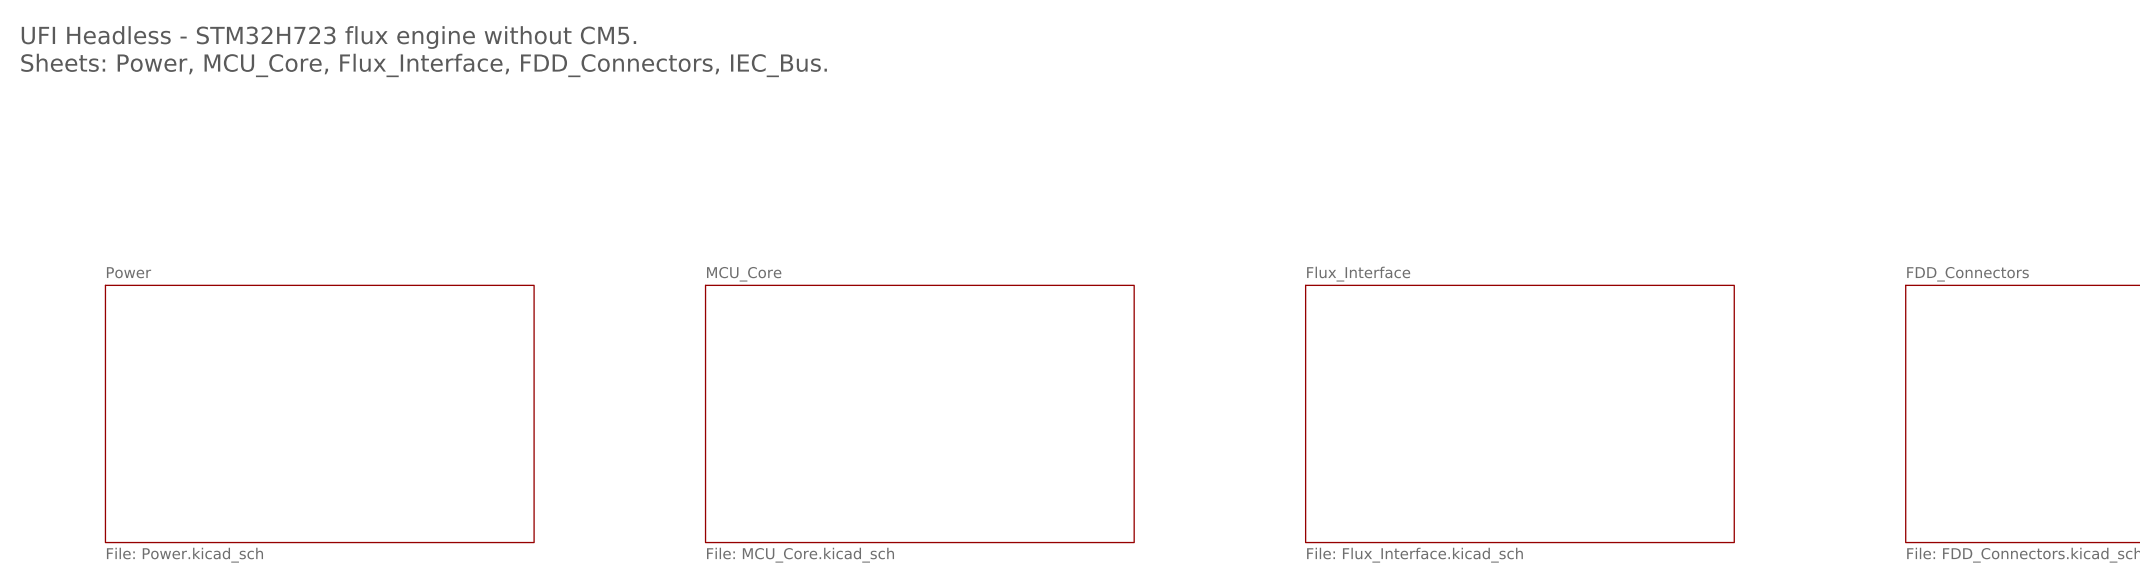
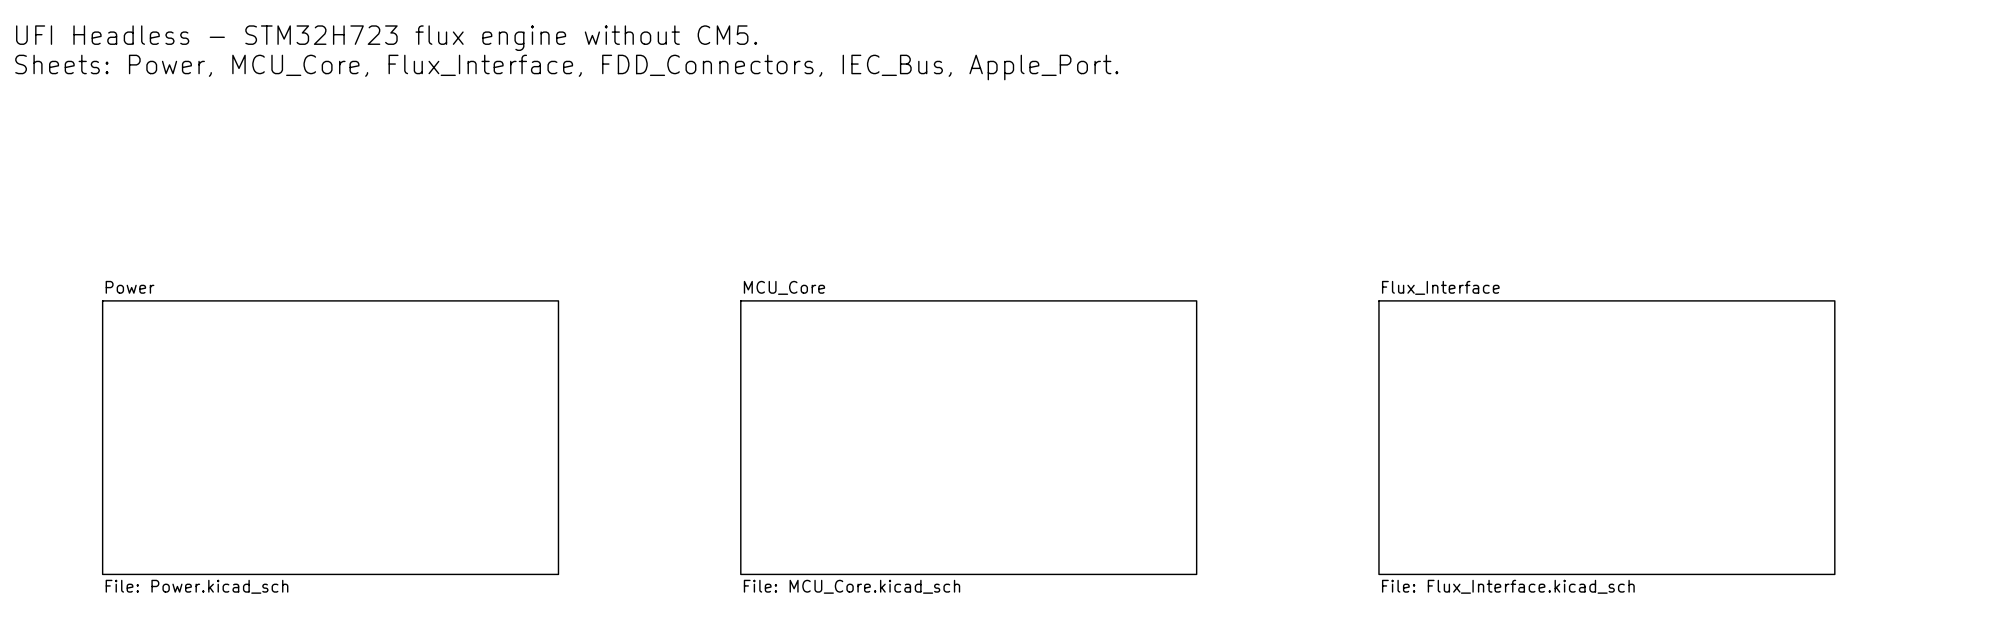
text: Sheets: Power, MCU_Core, Flux_Interface, FDD_Connectors, IEC_Bus. (424, 65) -> Sheets: Power, MCU_Core, Flux_Interface, FDD_Connectors, IEC_Bus, Apple_Port. (566, 67)

